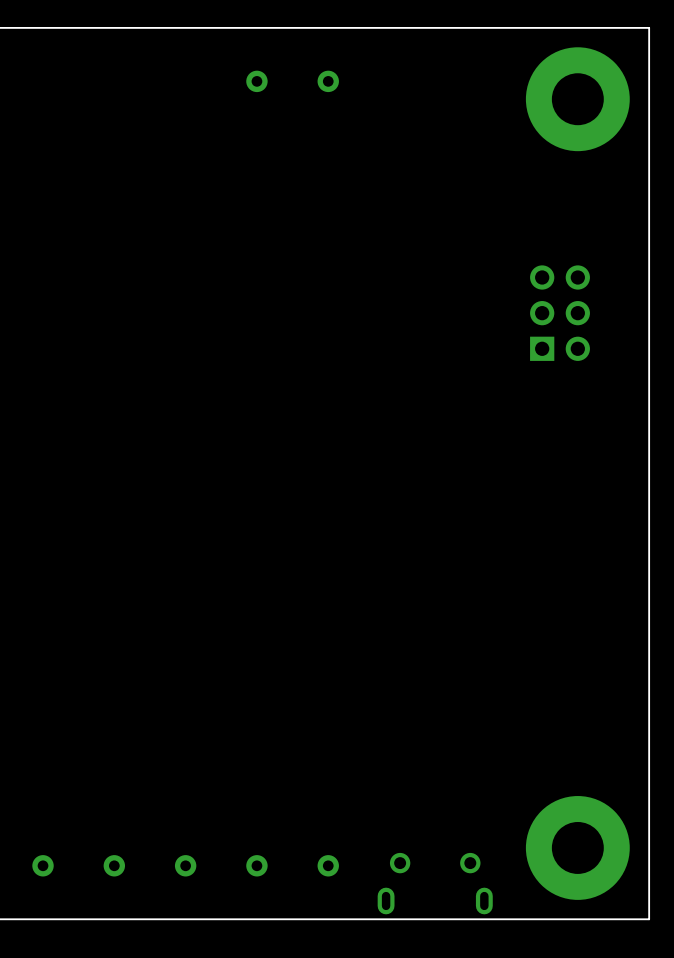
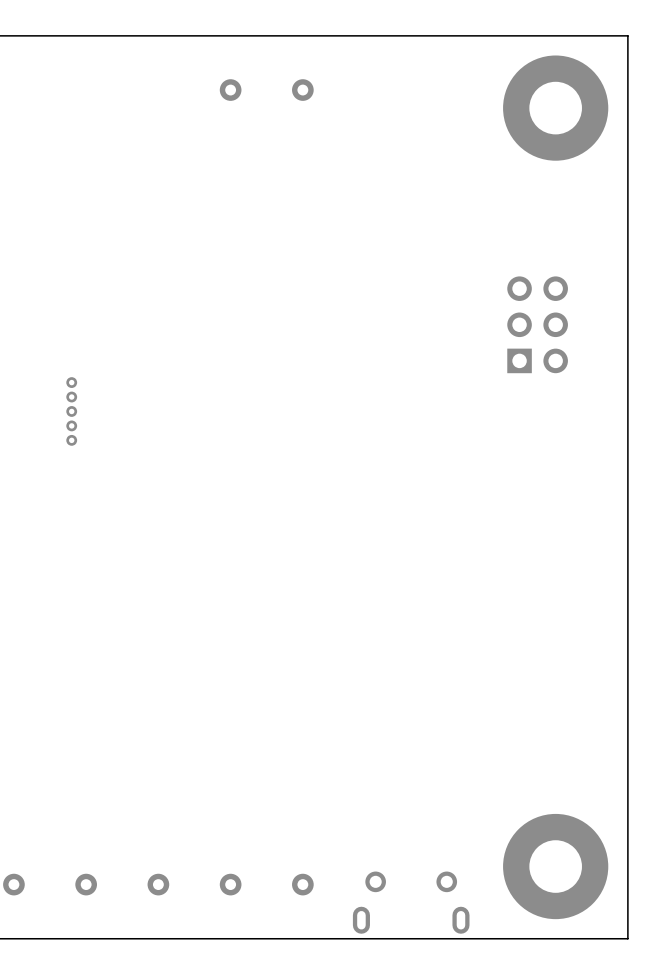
via: none -> (71, 382)
via: none -> (71, 397)
via: none -> (71, 411)
via: none -> (71, 425)
via: none -> (71, 440)

